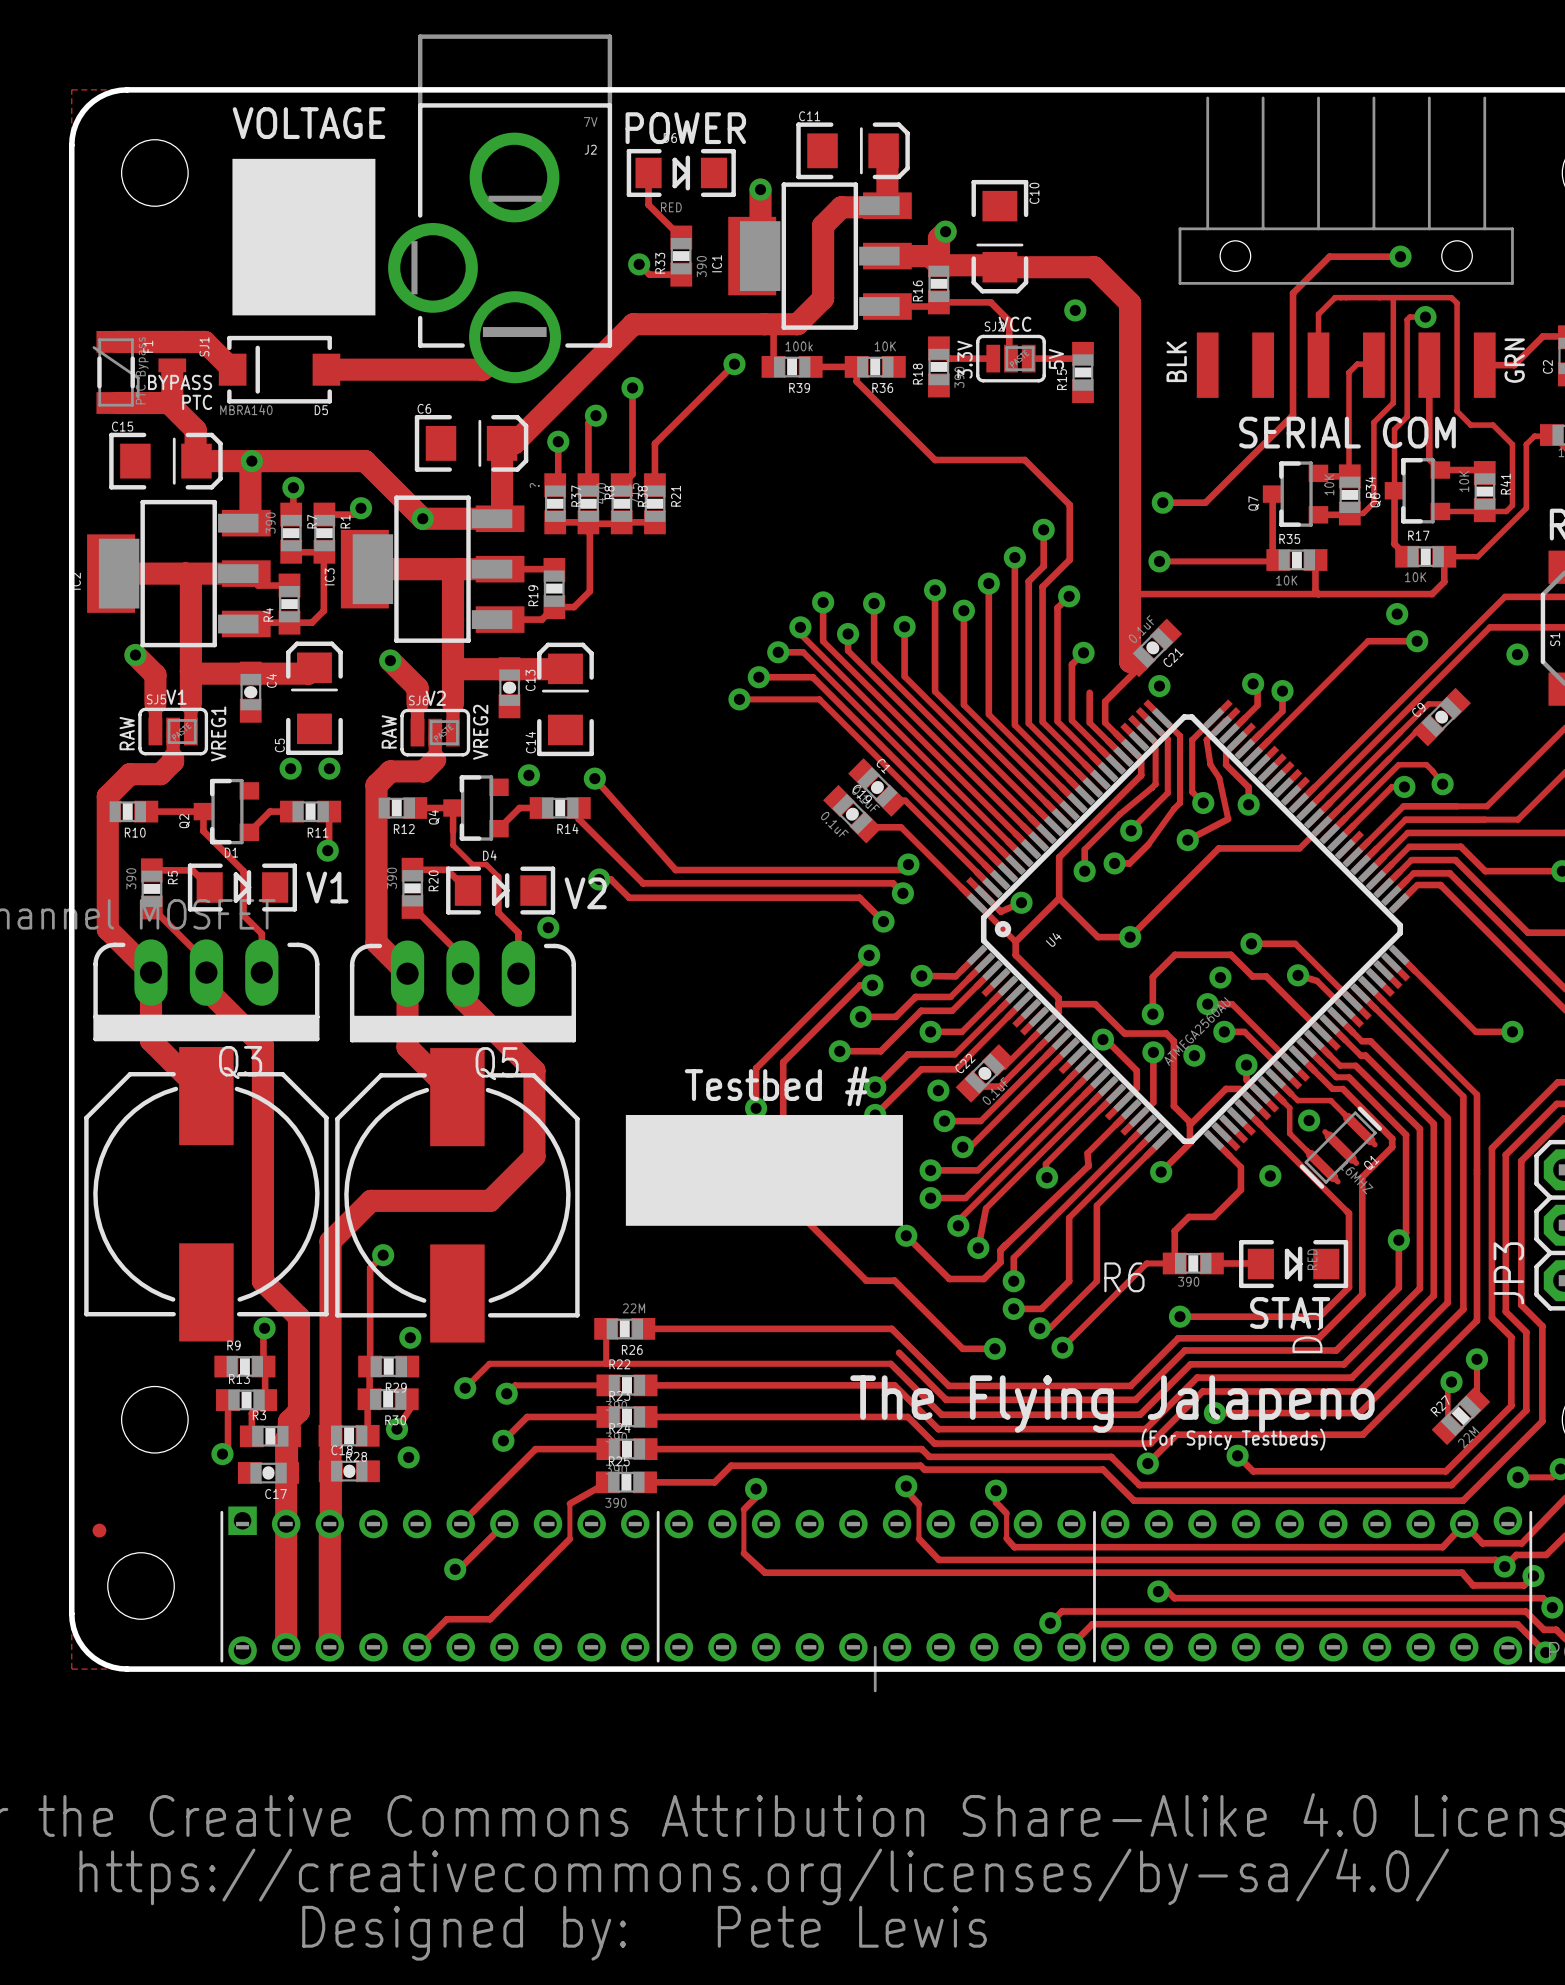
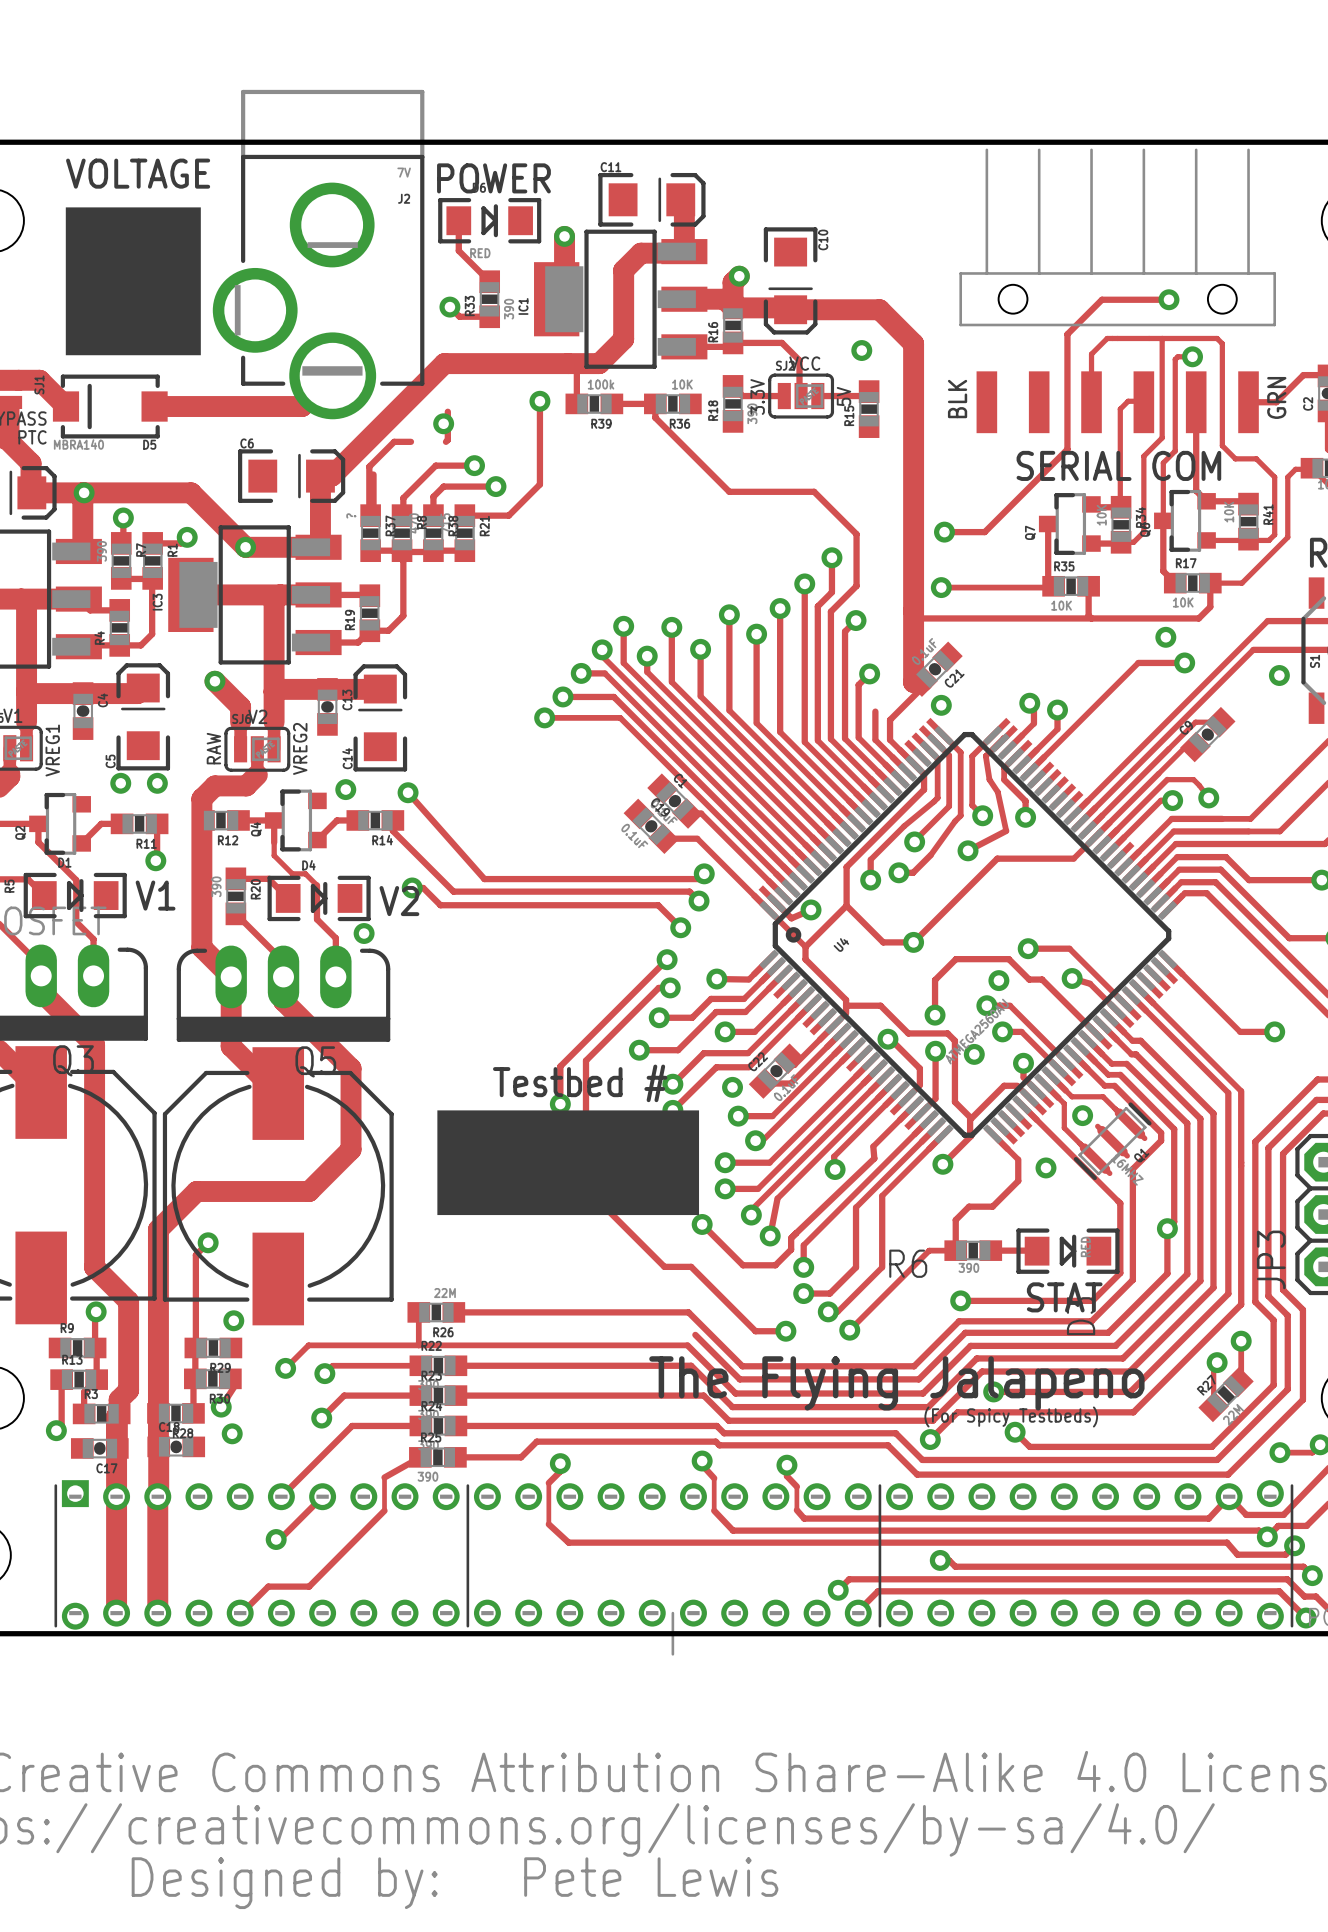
track: (734, 364) (654, 443) (654, 485) -> (539, 401) (539, 484) (508, 515) (464, 515)
track: none -> (447, 411) (447, 439) (445, 441)
track: (632, 387) (632, 474) (621, 485) -> (495, 486) (443, 486) (433, 496) (433, 515)
track: none -> (410, 441) (394, 441) (369, 466) (369, 514)
track: (595, 415) (588, 423) (588, 485) -> (474, 465) (435, 465) (403, 498) (402, 515)
via: (595, 415) -> none
via: none -> (474, 465)
via: (558, 441) -> none
via: none -> (495, 486)

